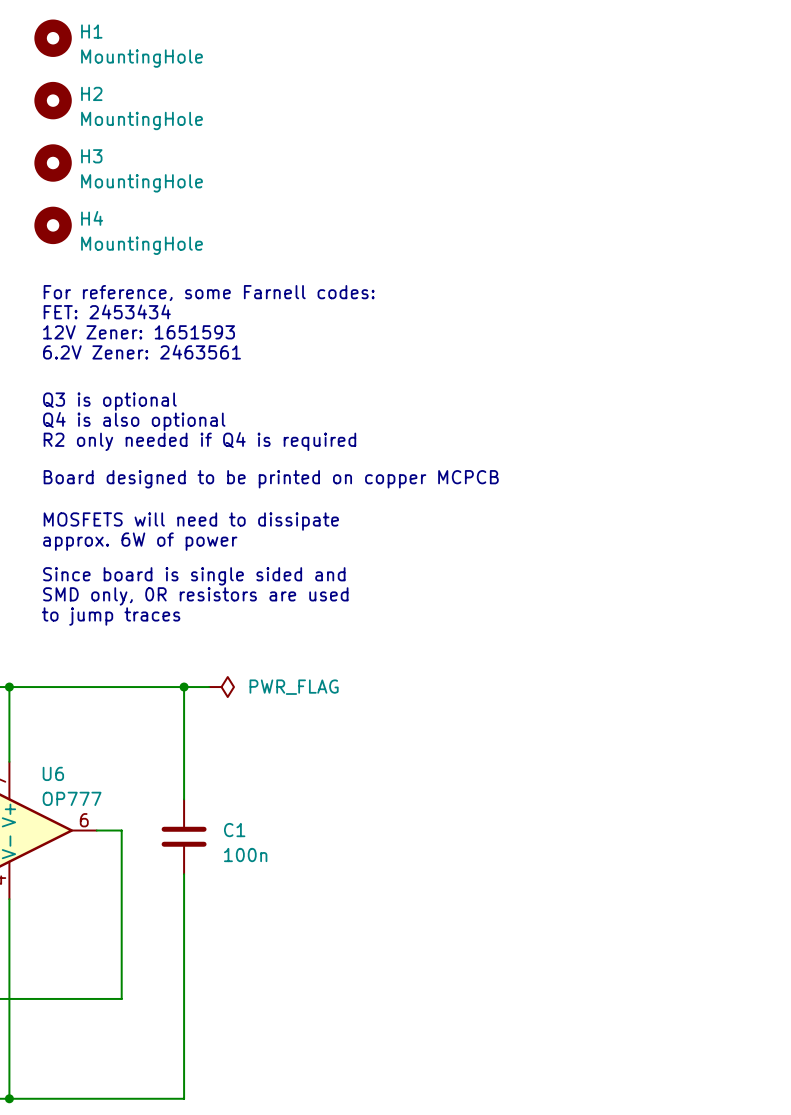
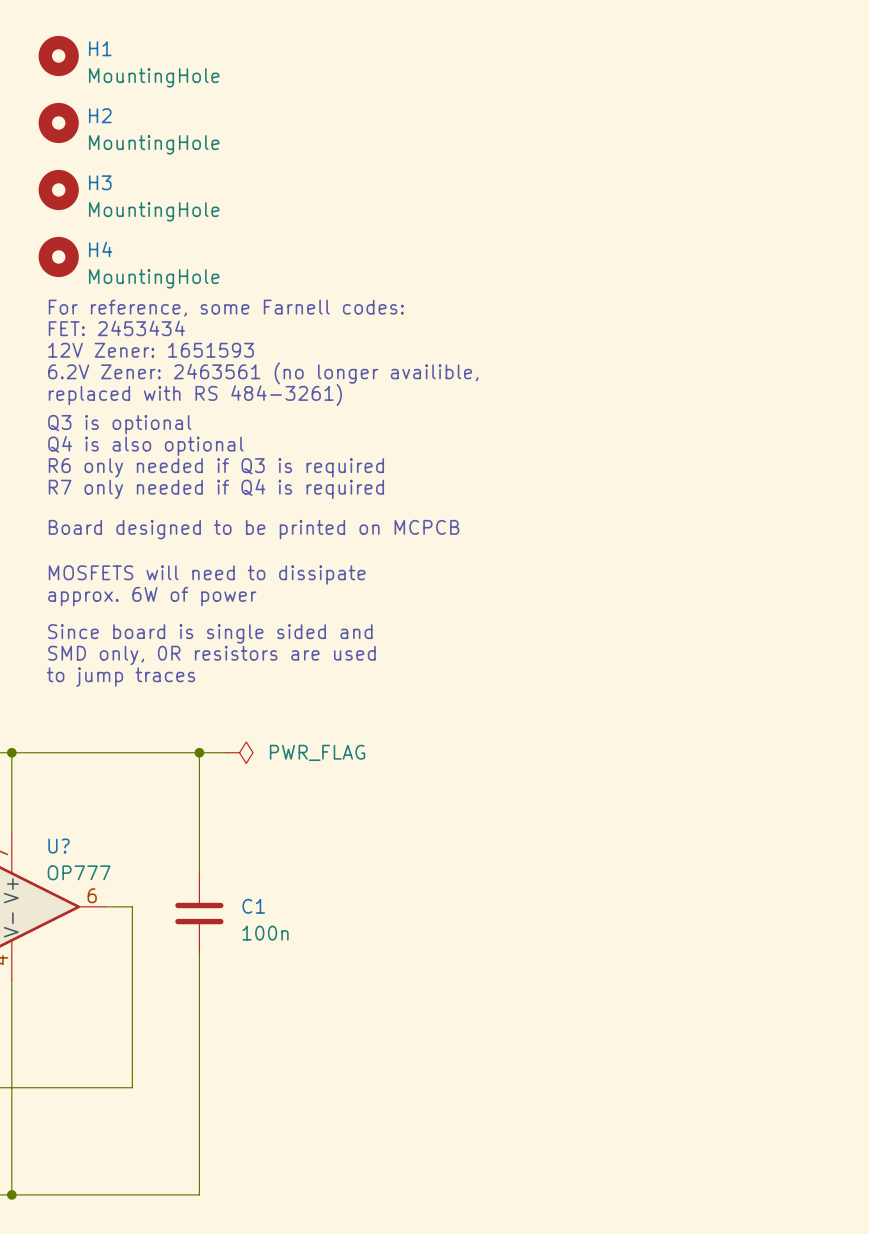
text: none -> For reference, some Farnell codes: (226, 308)
text: For reference, some Farnell codes: (209, 293) -> FET: 2453434 (116, 328)
text: FET: 2453434 (107, 311) -> 12V Zener: 1651593 (151, 350)
text: 12V Zener: 1651593 (139, 332) -> 6.2V Zener: 2463561 (no longer availible, (263, 373)
text: 6.2V Zener: 2463561 (141, 352) -> replaced with RS 484-3261) (195, 394)
text: none -> Q3 is optional (119, 424)
text: Q3 is optional (109, 401) -> Q4 is also optional (145, 445)
text: Q4 is also optional (134, 421) -> R6 only needed if Q3 is required (216, 467)
text: R2 only needed if Q4 is required (199, 441) -> R7 only needed if Q4 is required (216, 489)
text: Board designed to be printed on copper MCPCB (271, 479) -> Board designed to be printed on MCPCB (254, 529)
U6 name: U6 (53, 773) -> U? (59, 846)

